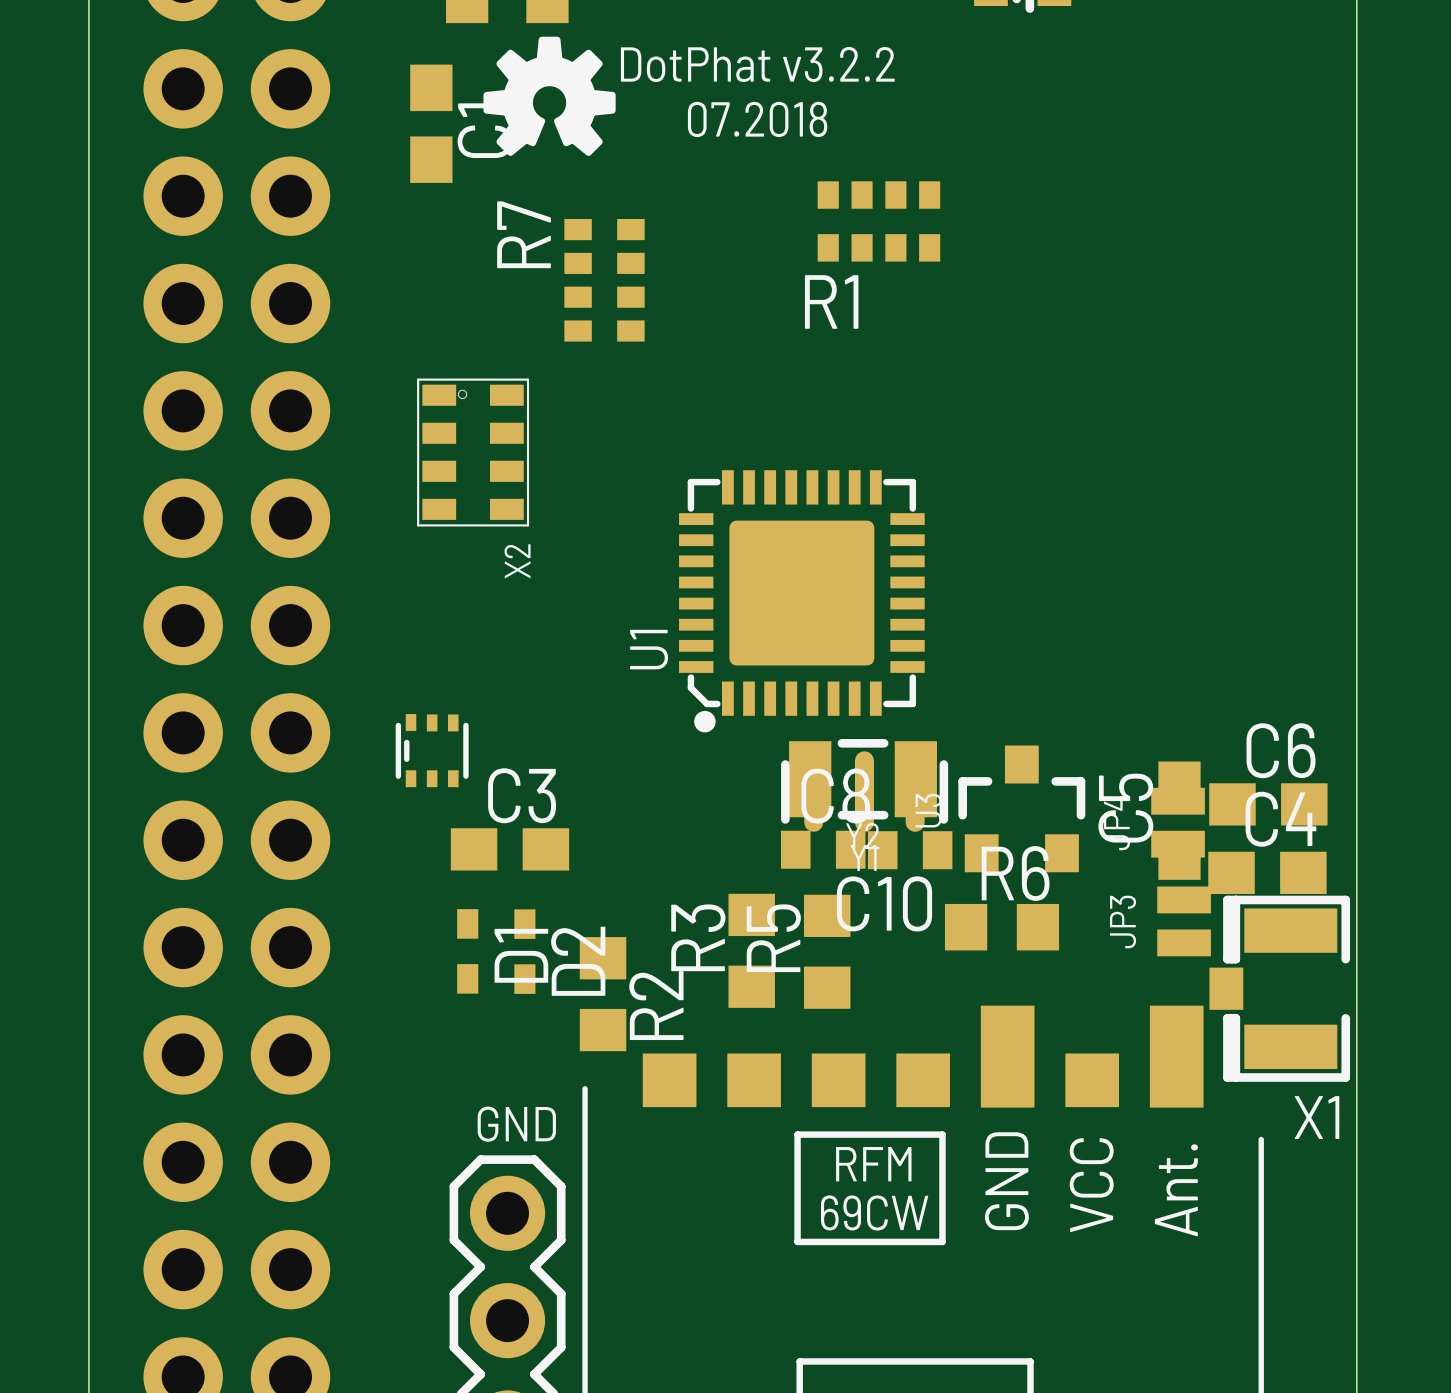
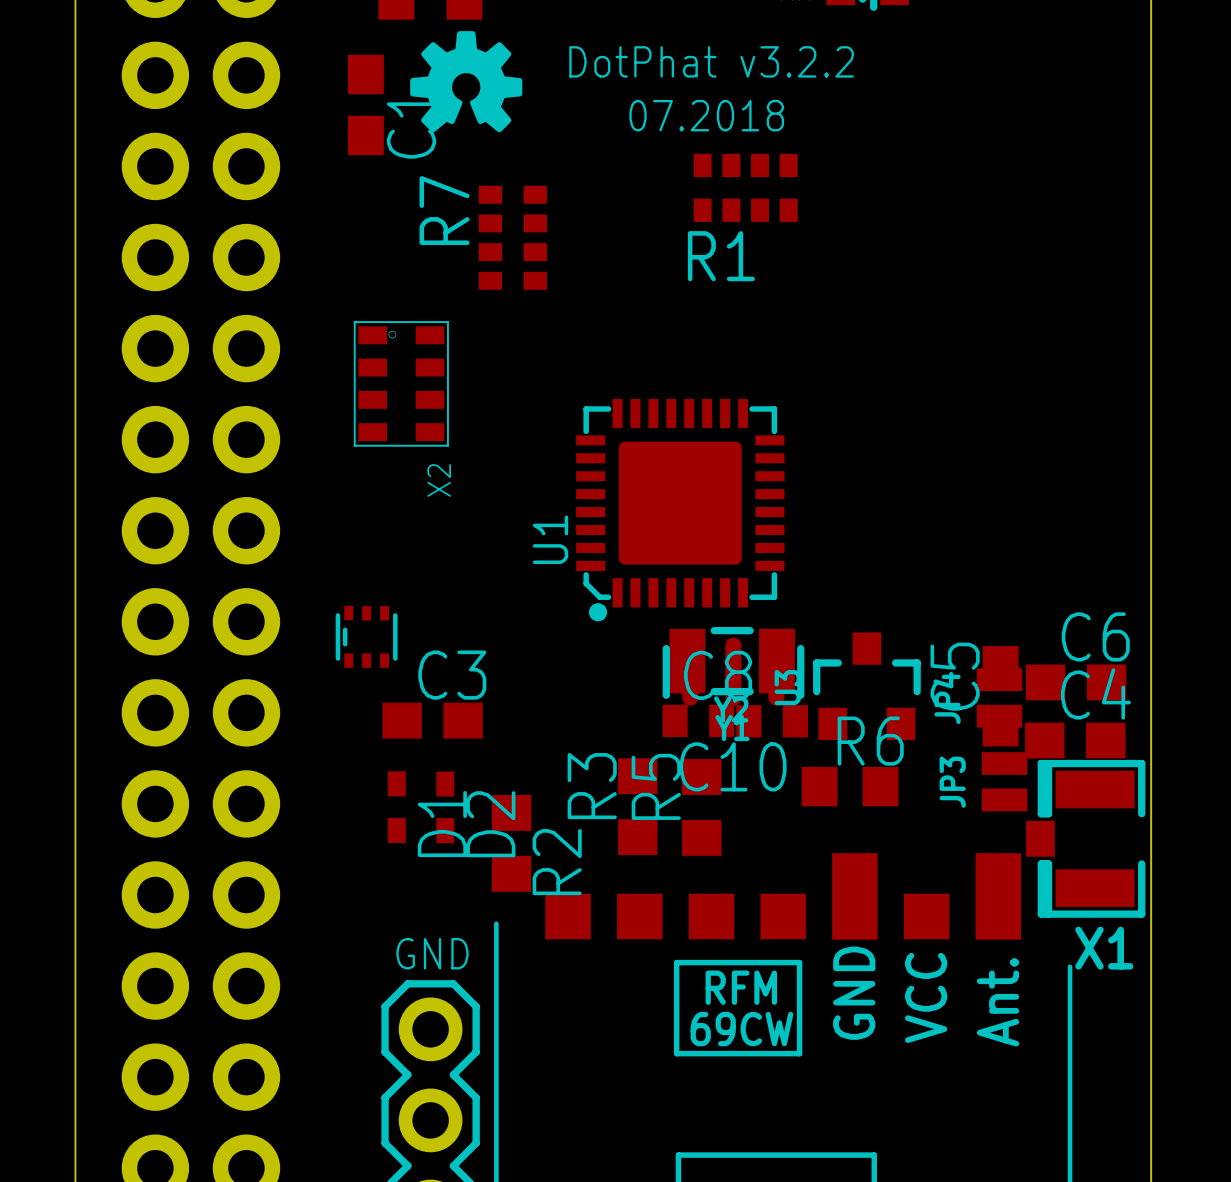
text position: DotPhat v3.2.2 (757, 64) -> DotPhat v3.2.2 (711, 61)
text position: 07.2018 (757, 119) -> 07.2018 (706, 115)

